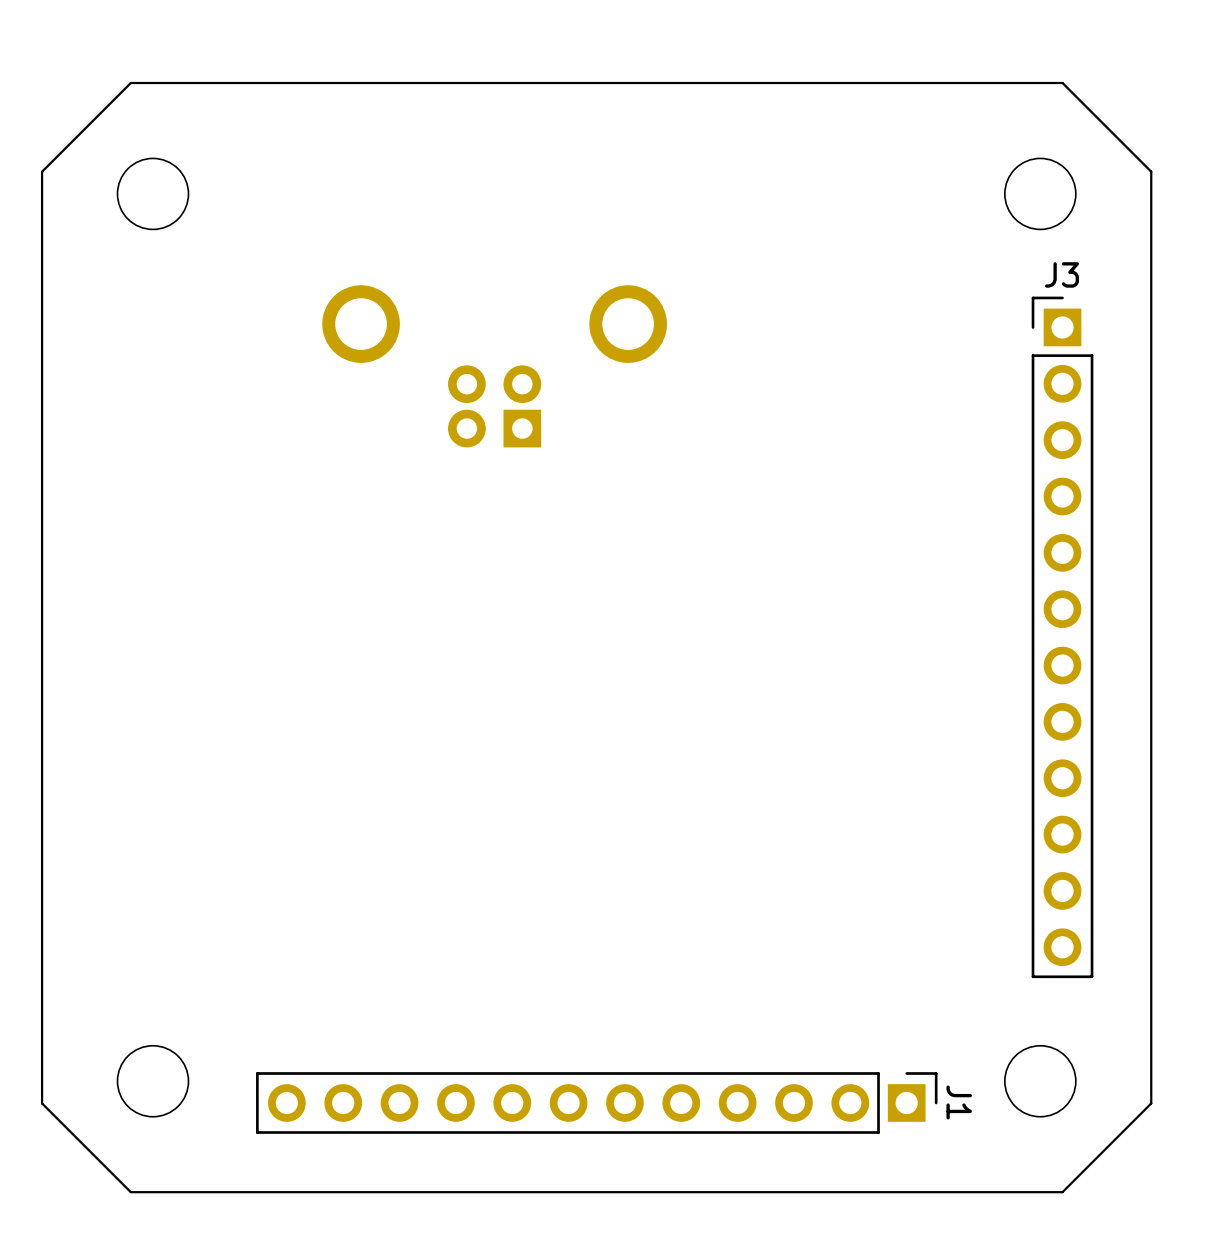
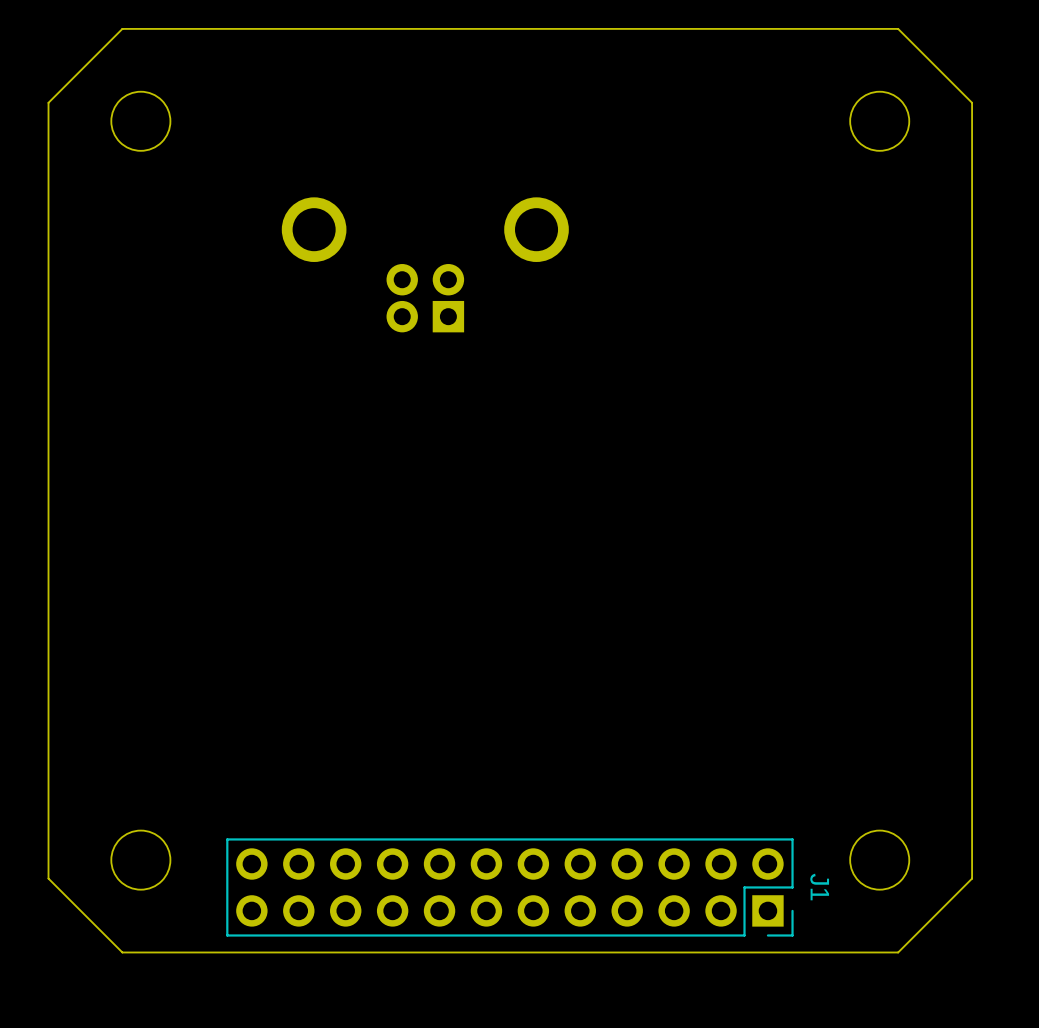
J3: (1062, 637) -> none
J1 footprint: [256, 1072, 938, 1134] -> [226, 838, 794, 937]

